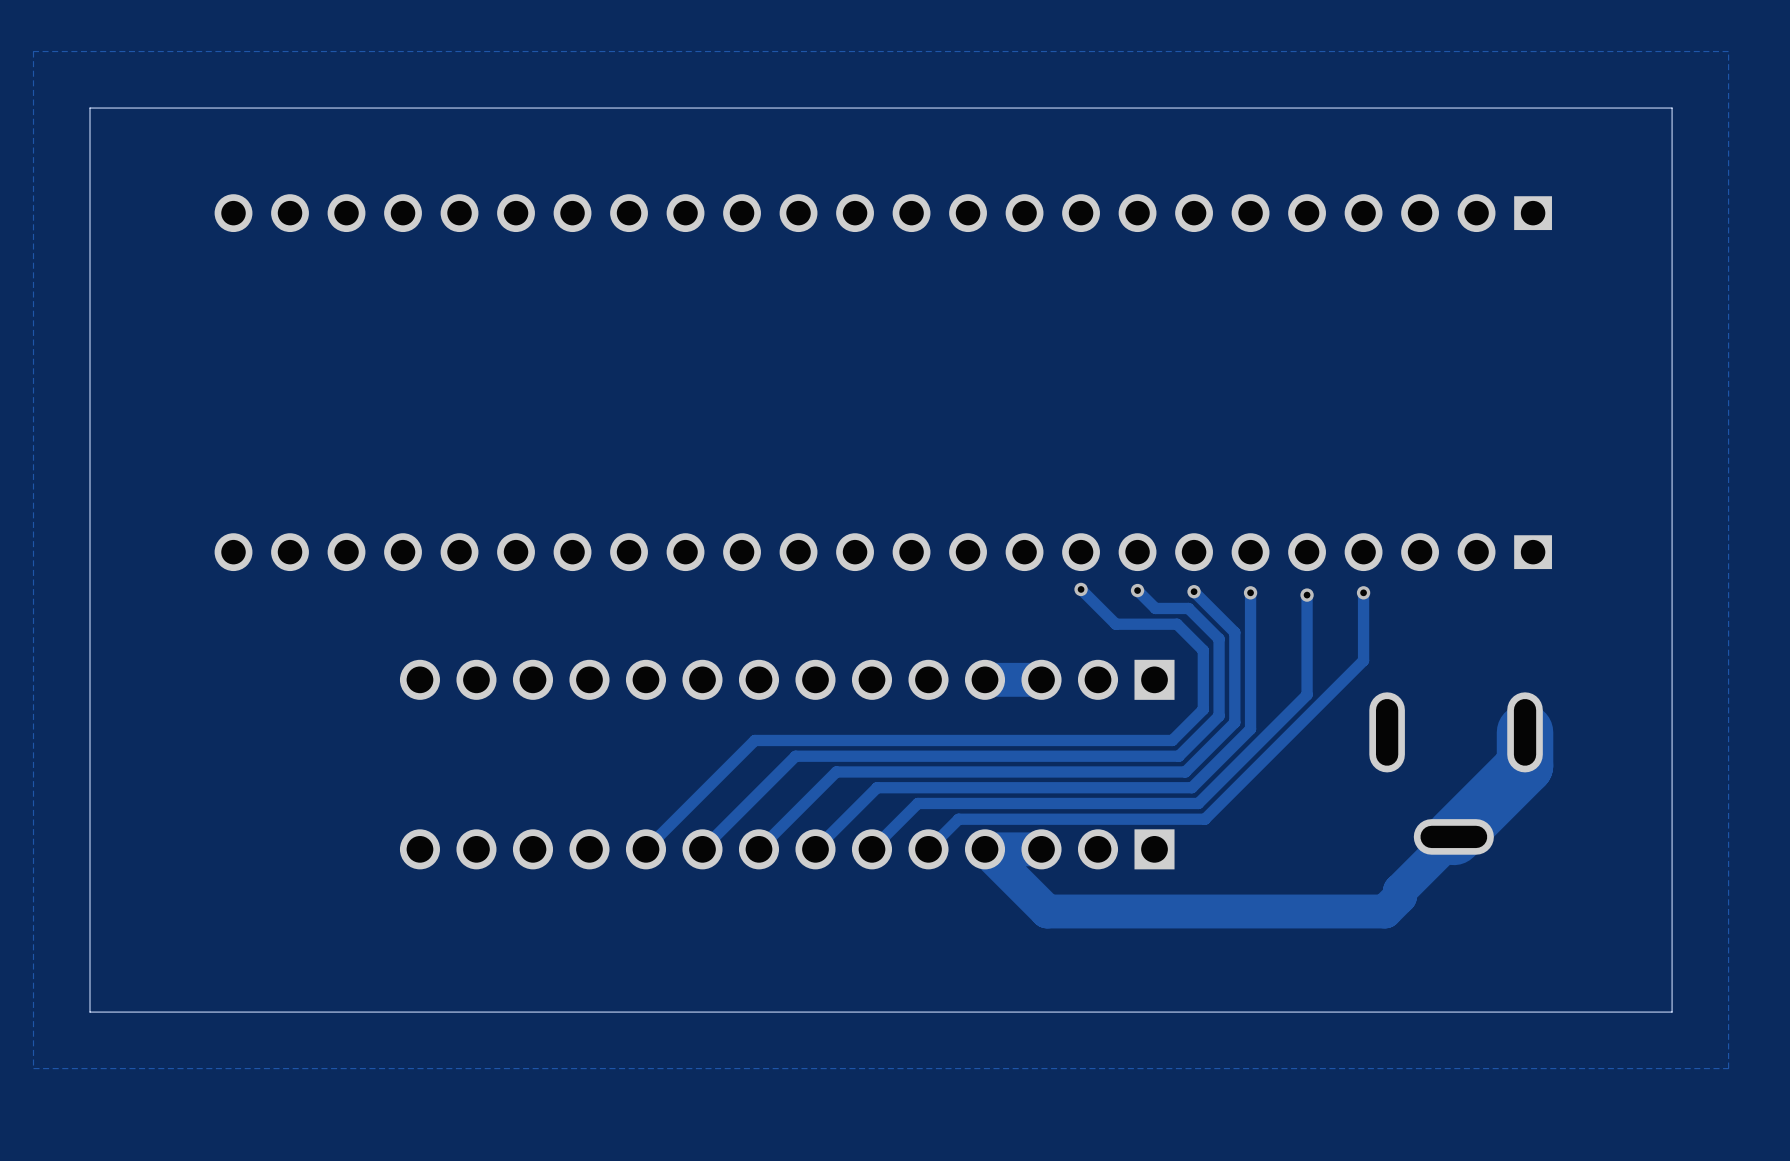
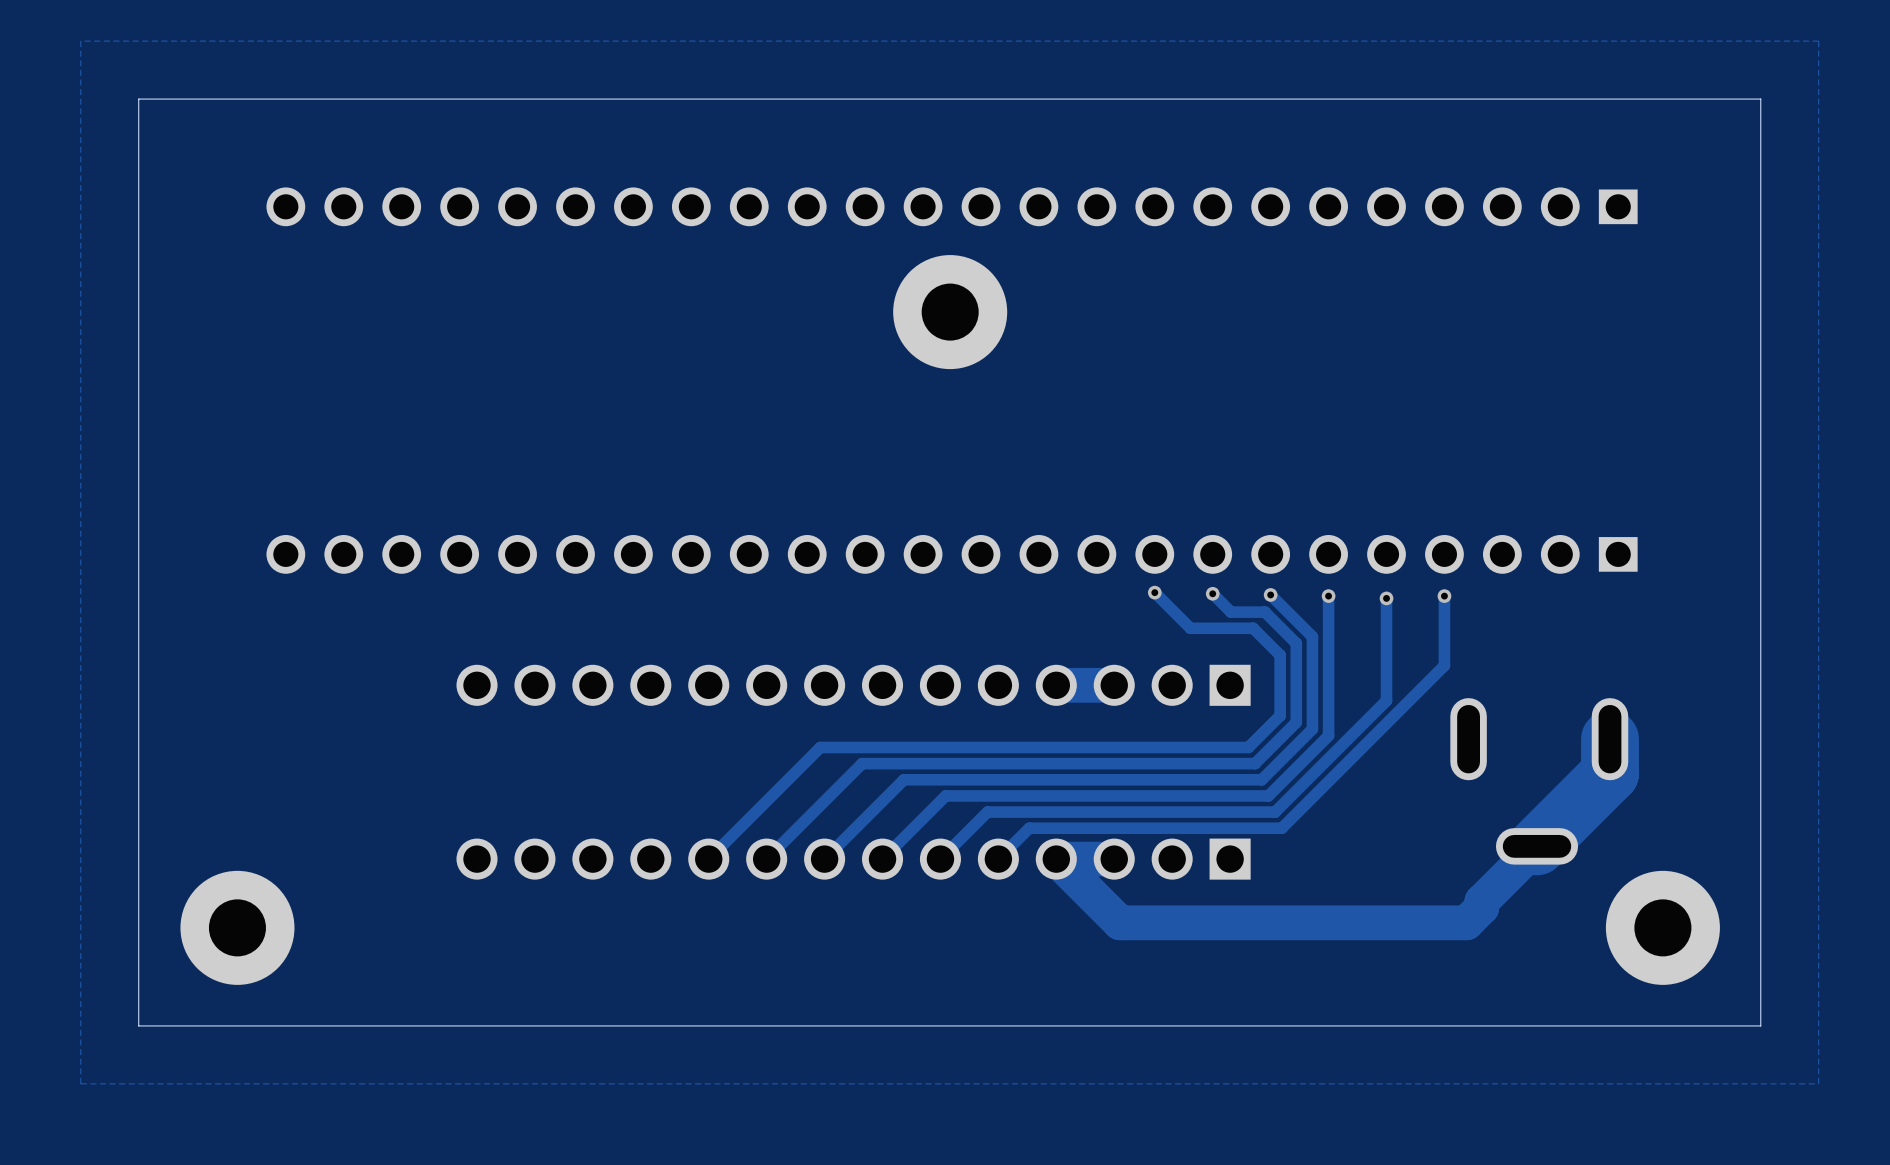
part: none -> (950, 312)
part: none -> (237, 927)
part: none -> (1662, 927)

